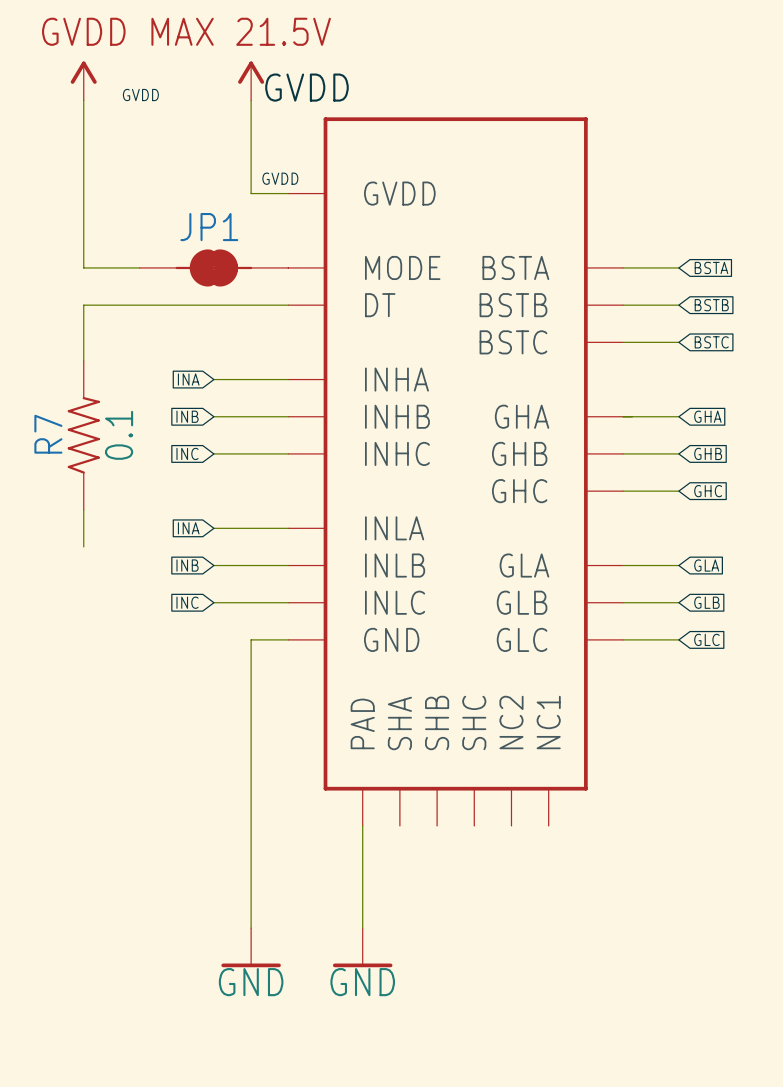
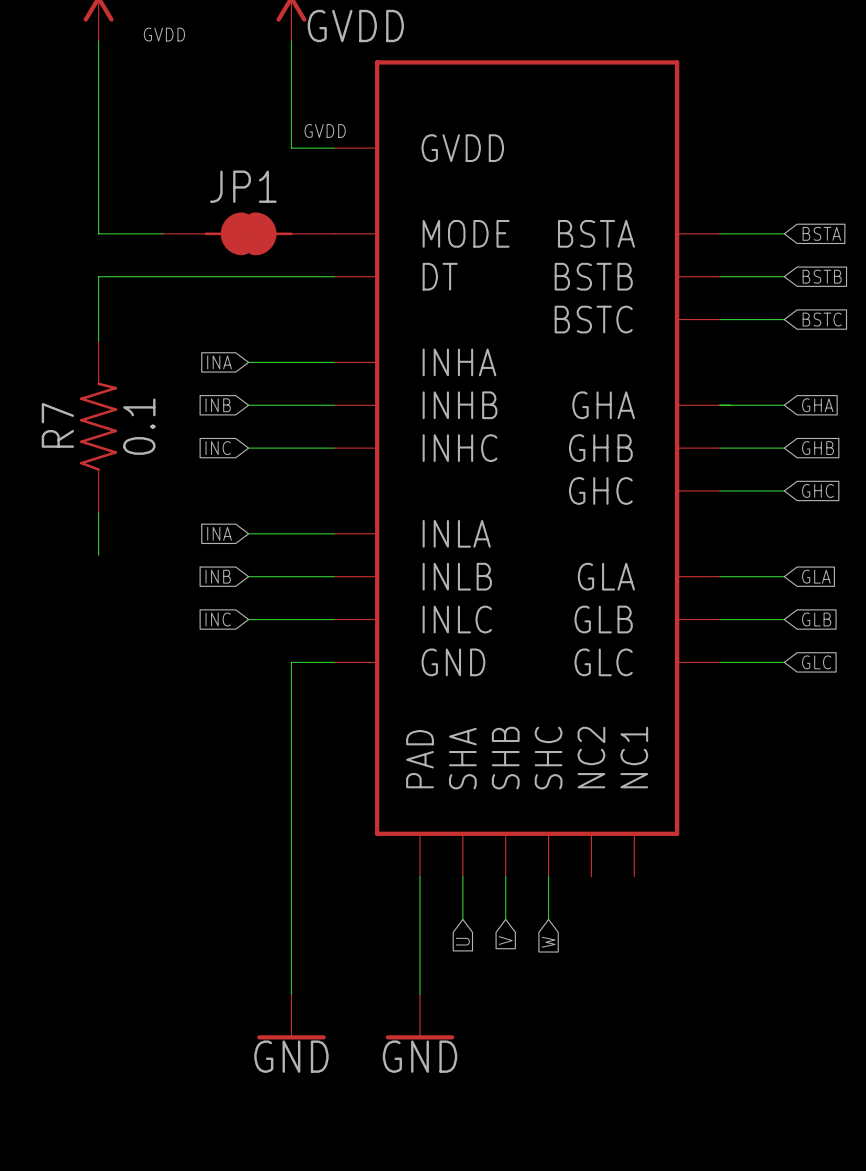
wire: none -> (462, 876) (462, 919)
wire: none -> (505, 876) (505, 919)
wire: none -> (548, 876) (548, 919)
global label: none -> V (505, 940)
global label: none -> U (462, 941)
global label: none -> W (548, 942)

